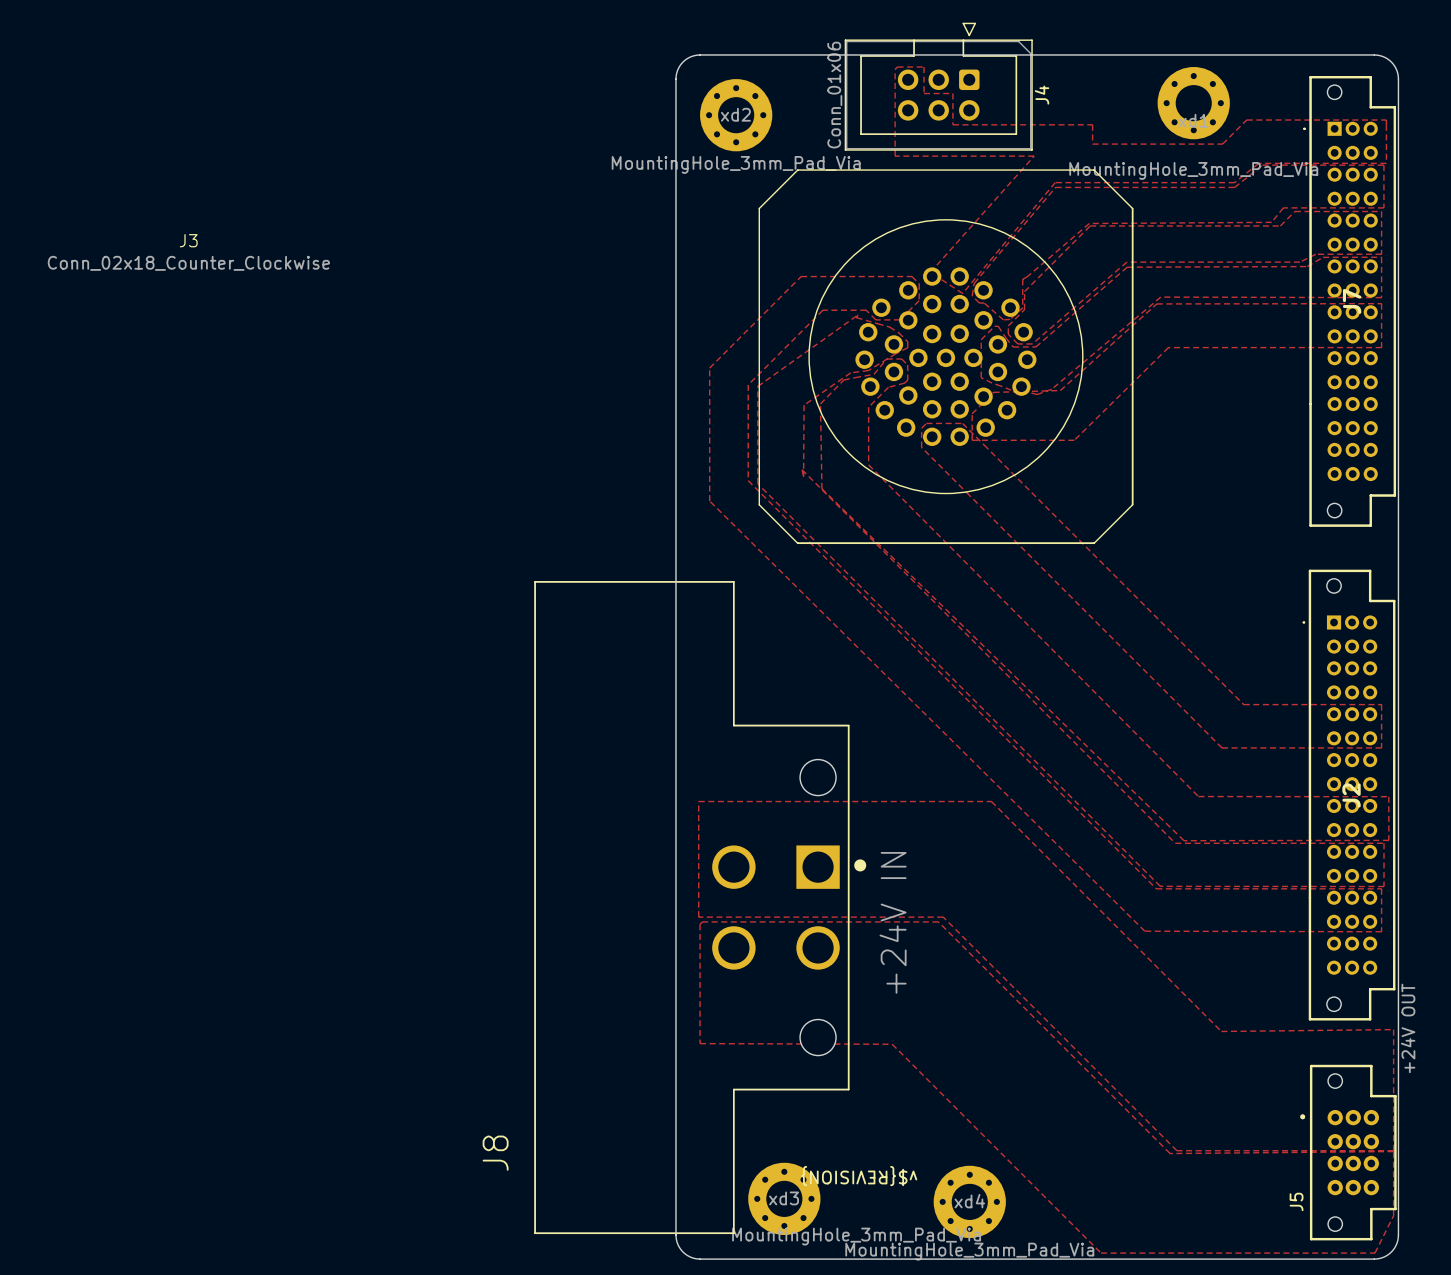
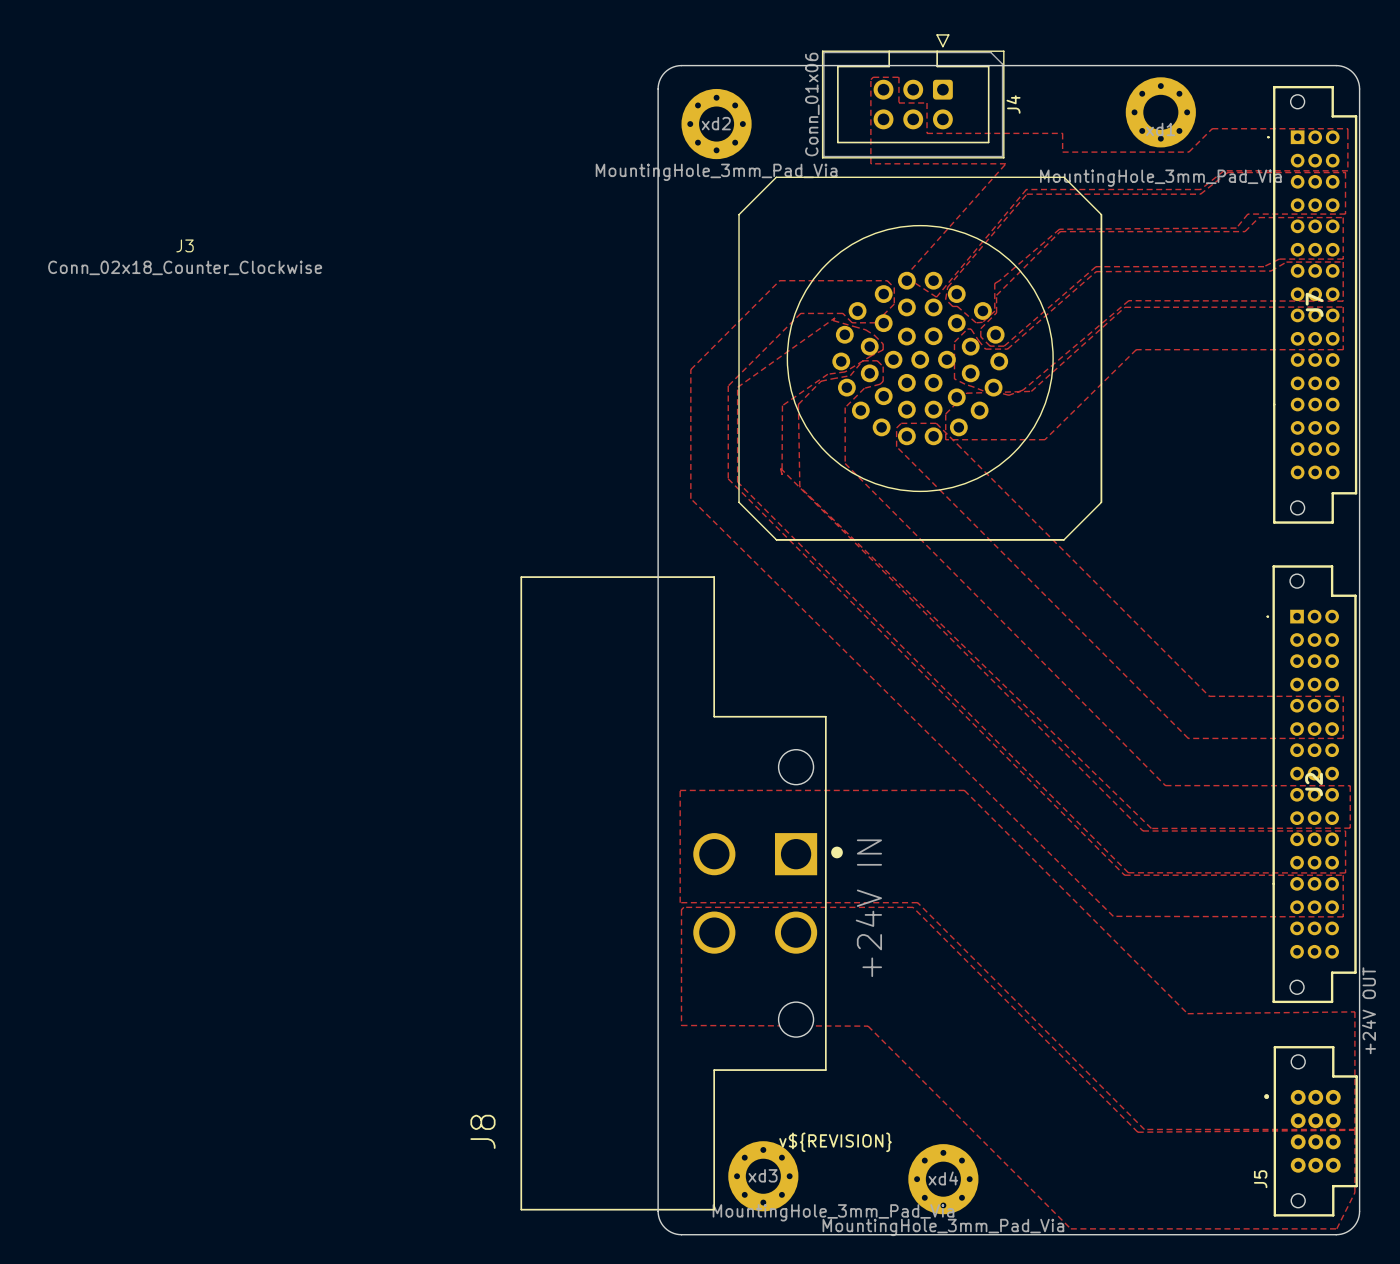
text rotation: 0° (859, 1176) -> 180° (835, 1142)

